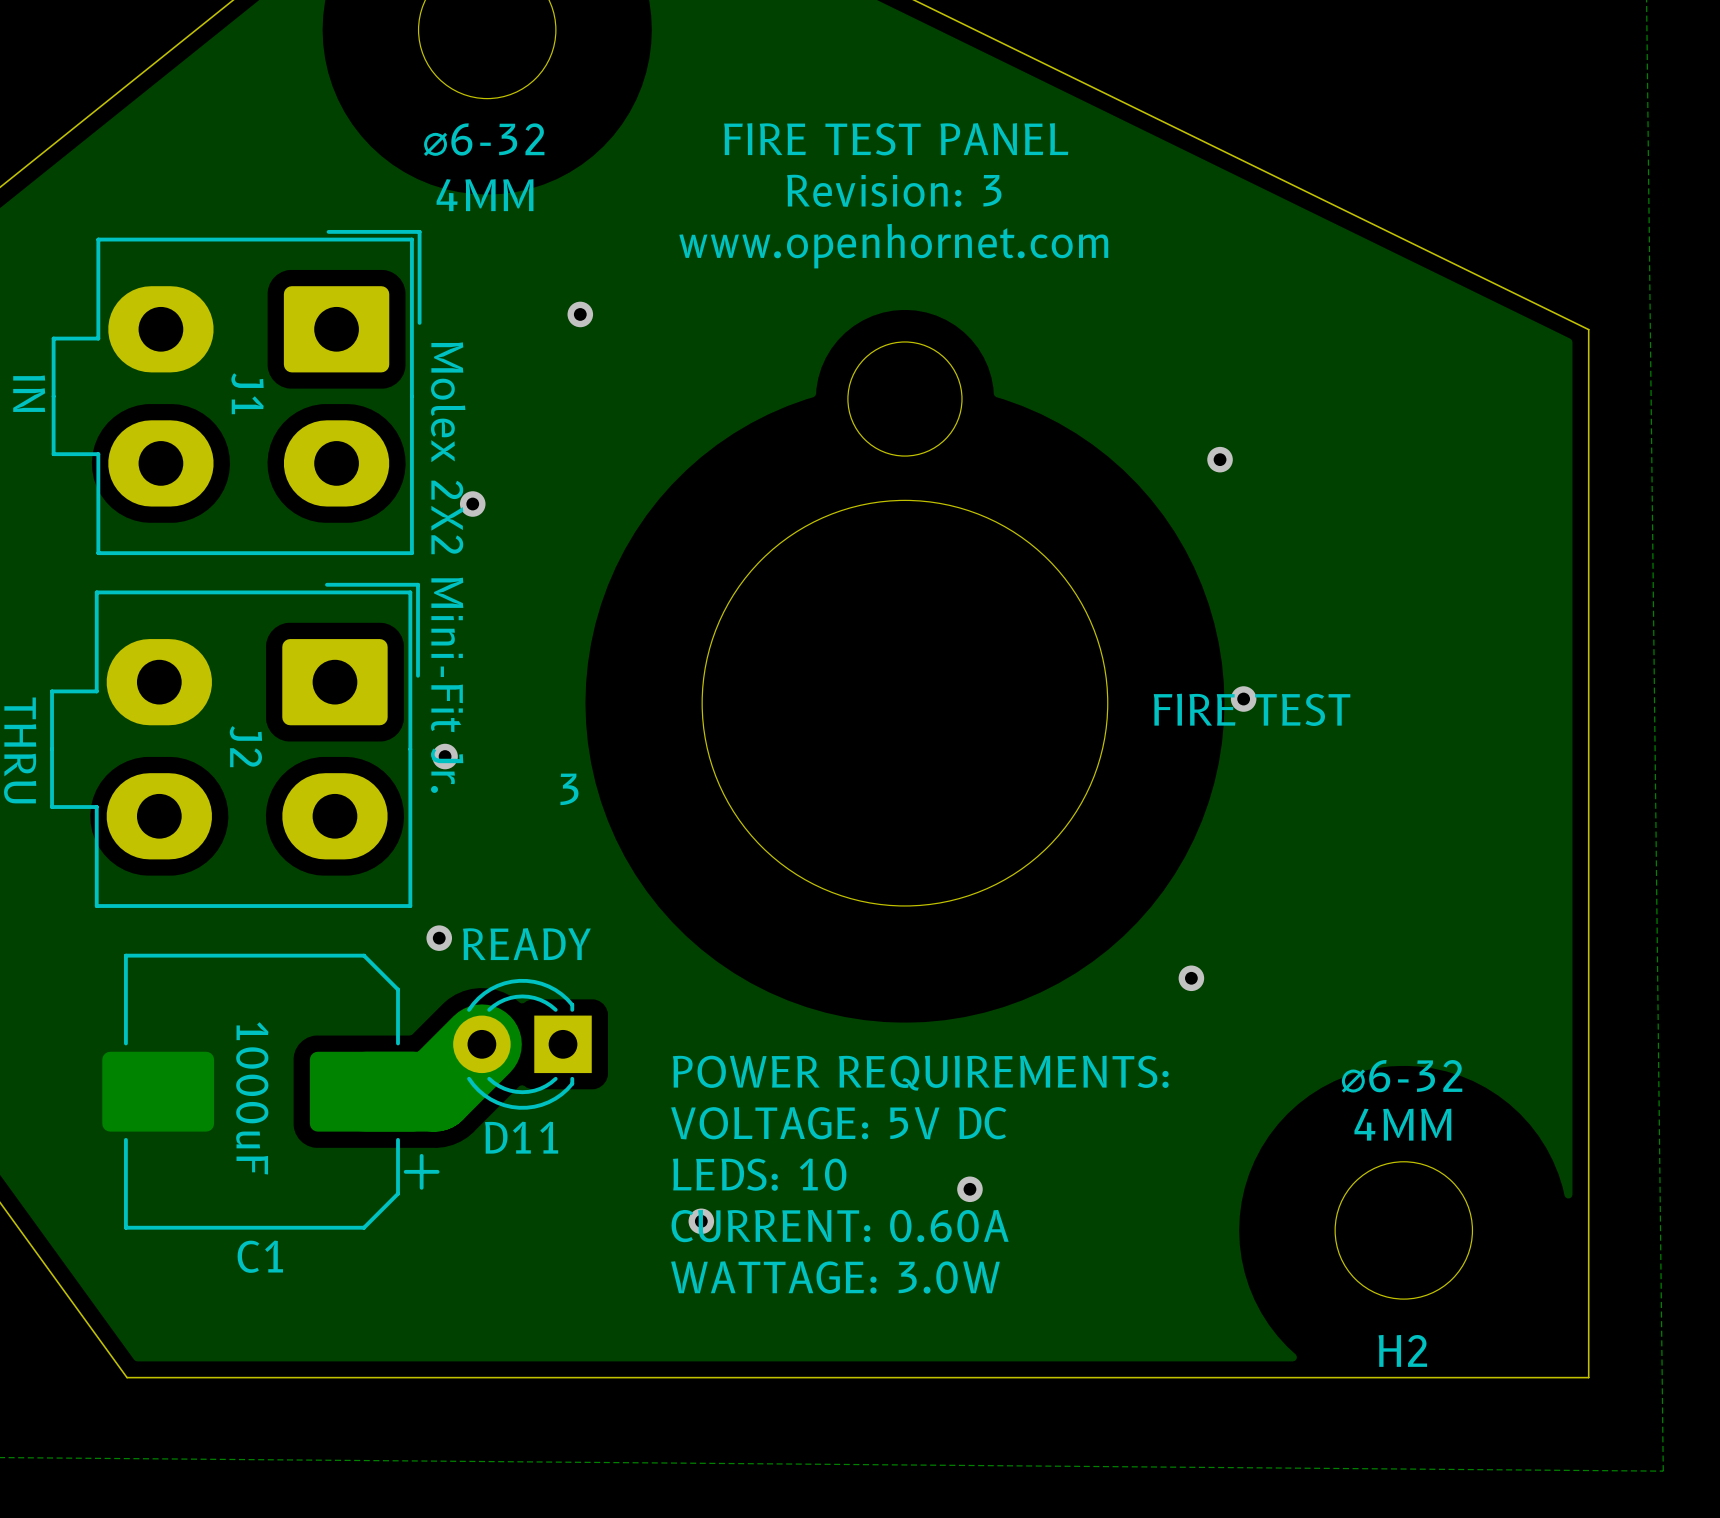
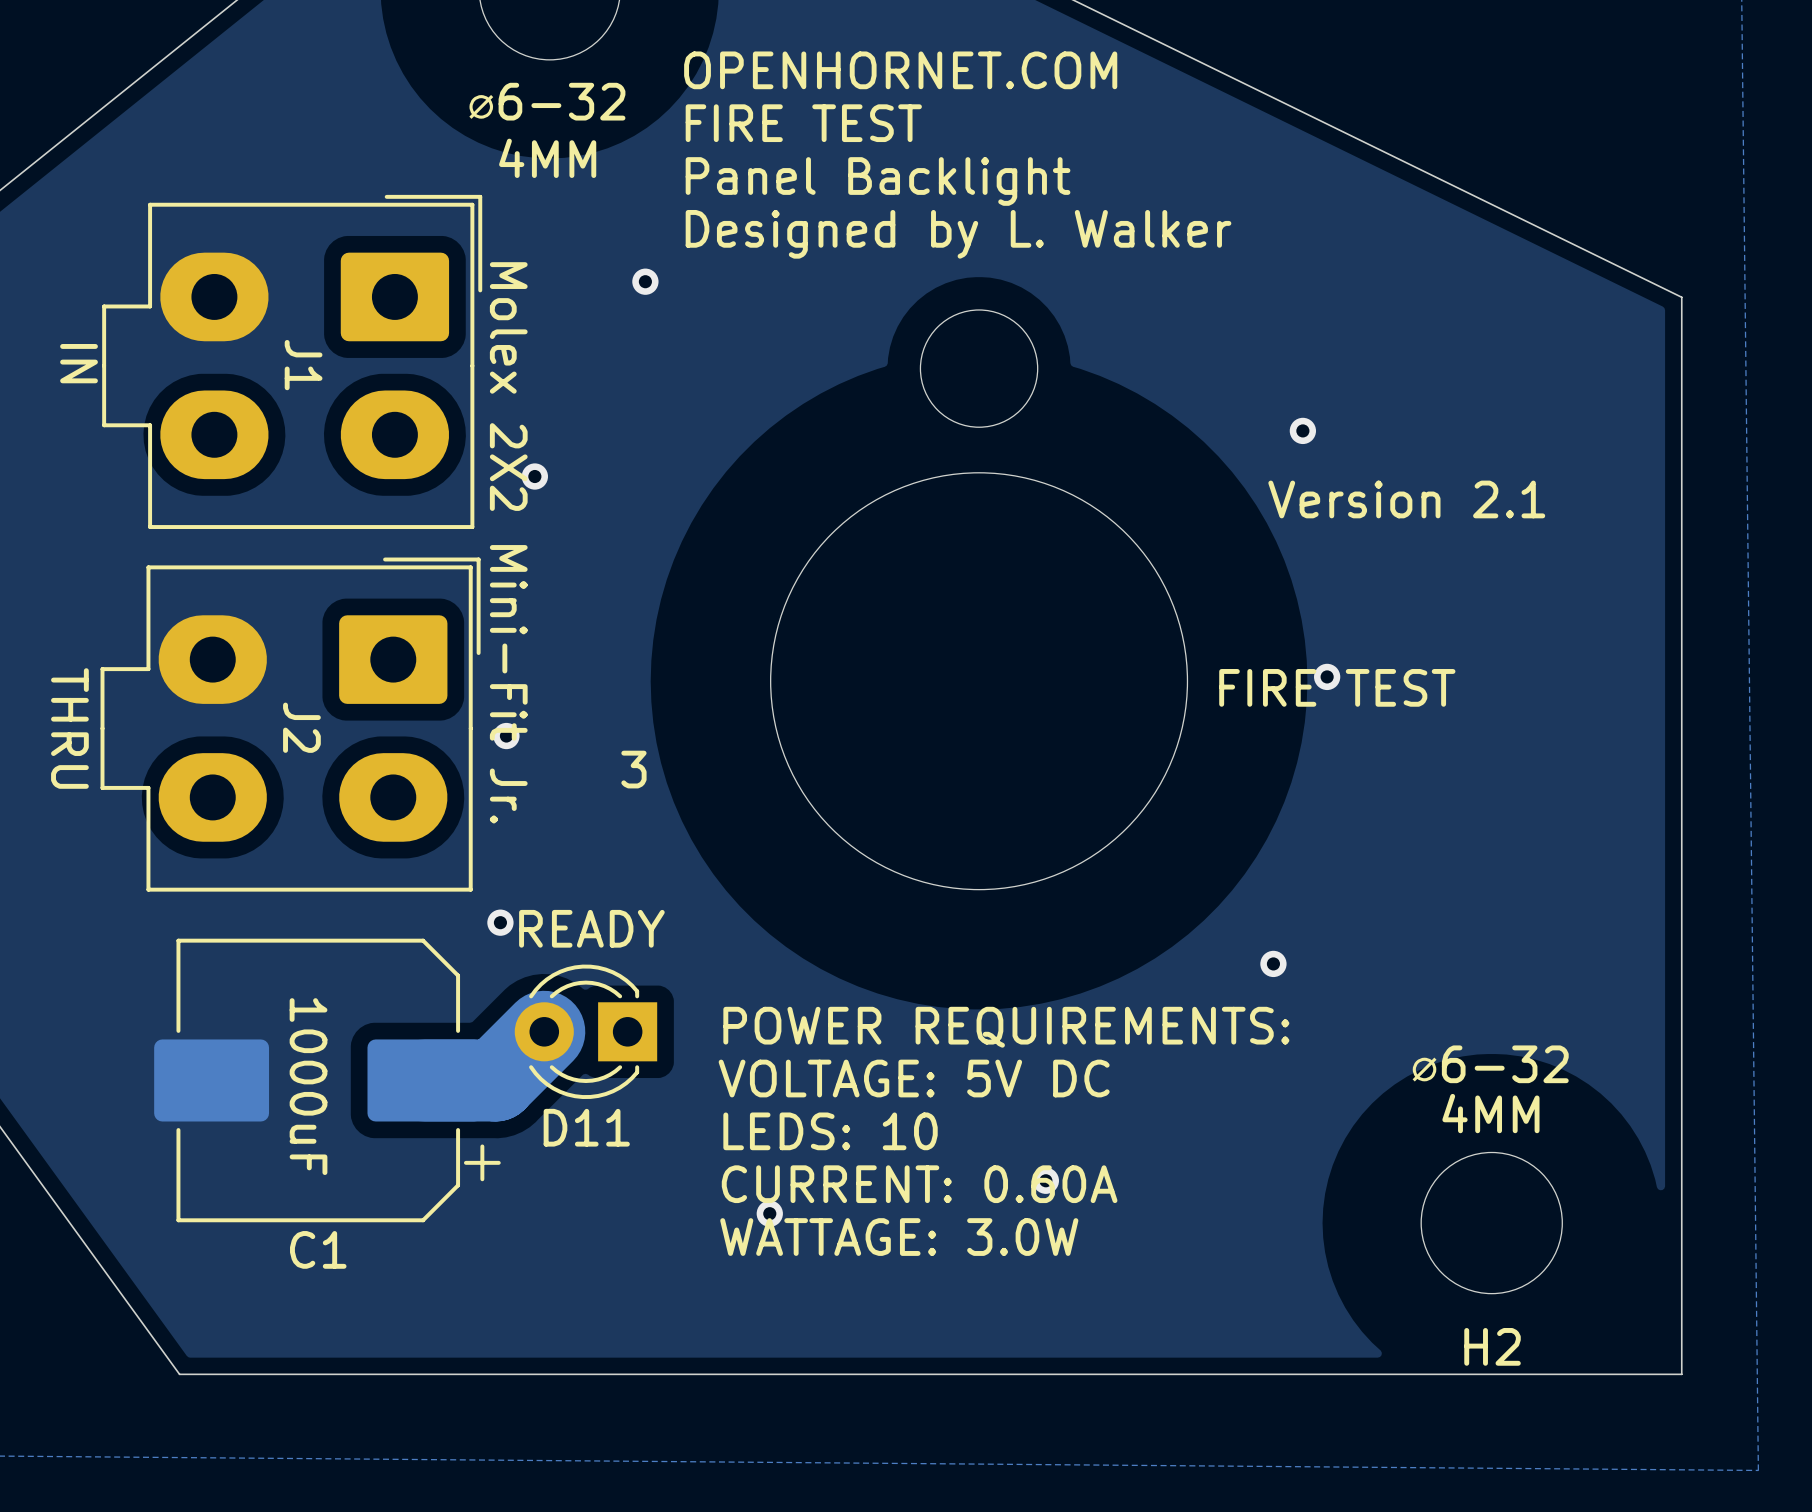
text: none -> OPENHORNET.COM (900, 70)
text: FIRE TEST PANEL (896, 139) -> FIRE TEST (803, 123)
text: Revision: 3 (894, 190) -> none
text: none -> Panel Backlight (878, 181)
text: www.openhornet.com (893, 246) -> none
text: none -> Designed by L. Walker (958, 234)
text: none -> Version 2.1 (1406, 499)
text position: POWER REQUIREMENTS: (920, 1073) -> POWER REQUIREMENTS: (1006, 1027)
text position: VOLTAGE: 5V DC (838, 1123) -> VOLTAGE: 5V DC (914, 1078)
text position: LEDS: 10 (759, 1174) -> LEDS: 10 (830, 1131)
text position: CURRENT: 0.60A (840, 1226) -> CURRENT: 0.60A (919, 1184)
text position: WATTAGE: 3.0W (835, 1277) -> WATTAGE: 3.0W (899, 1237)

